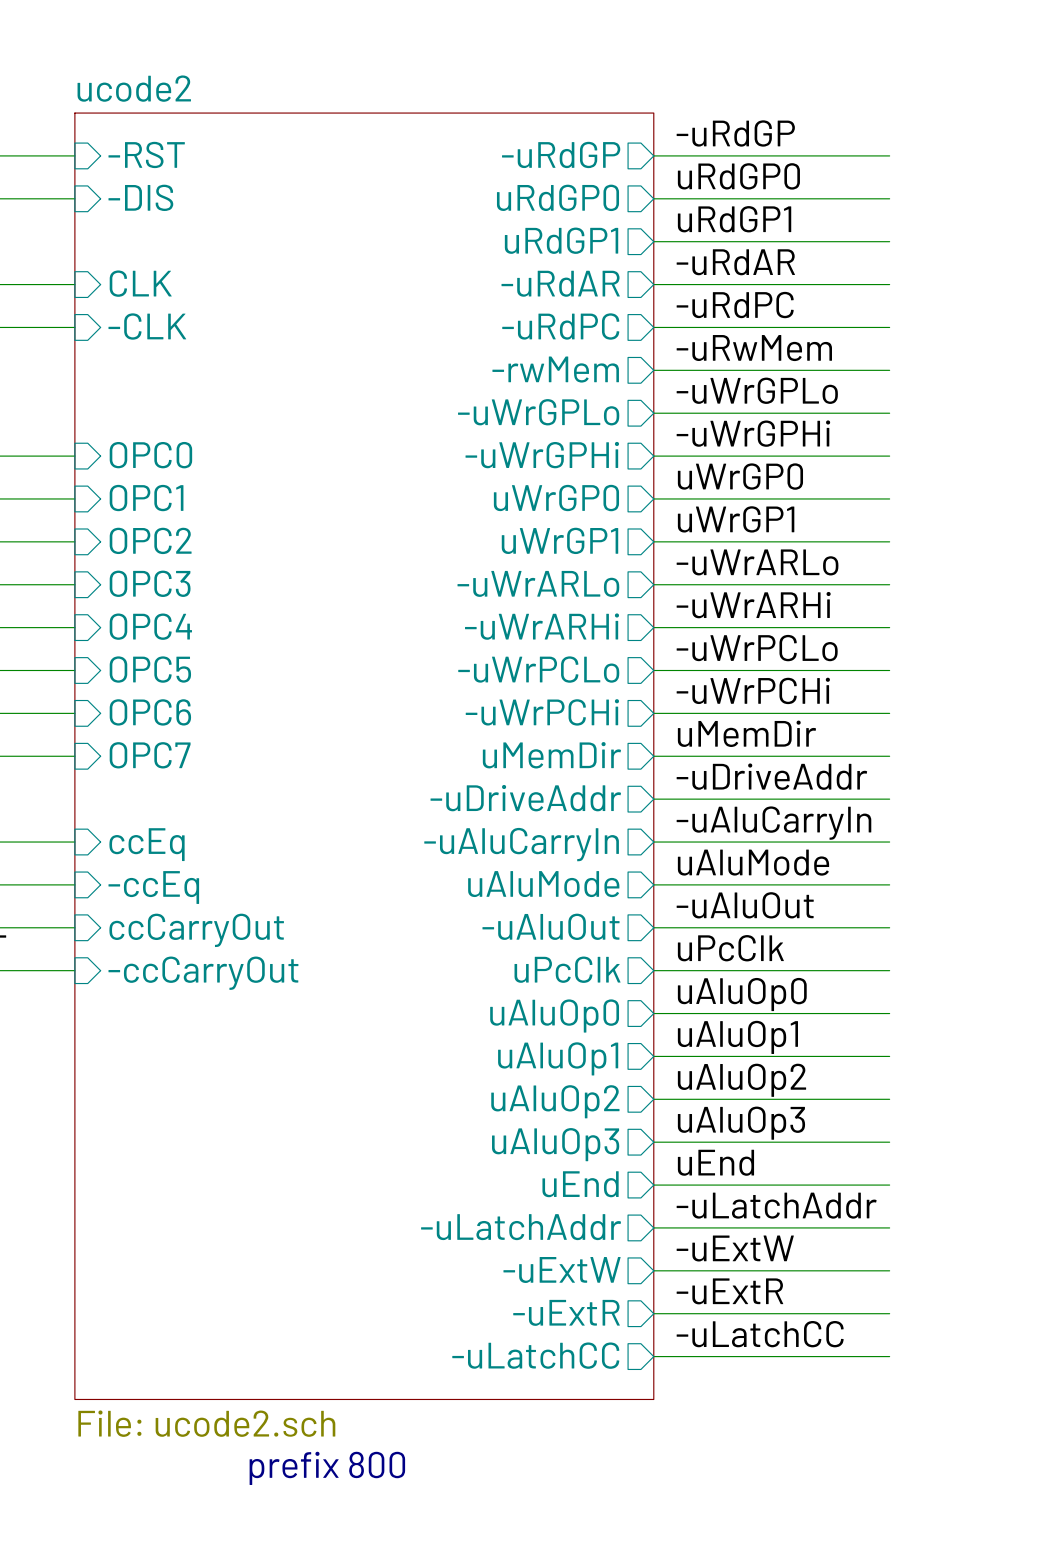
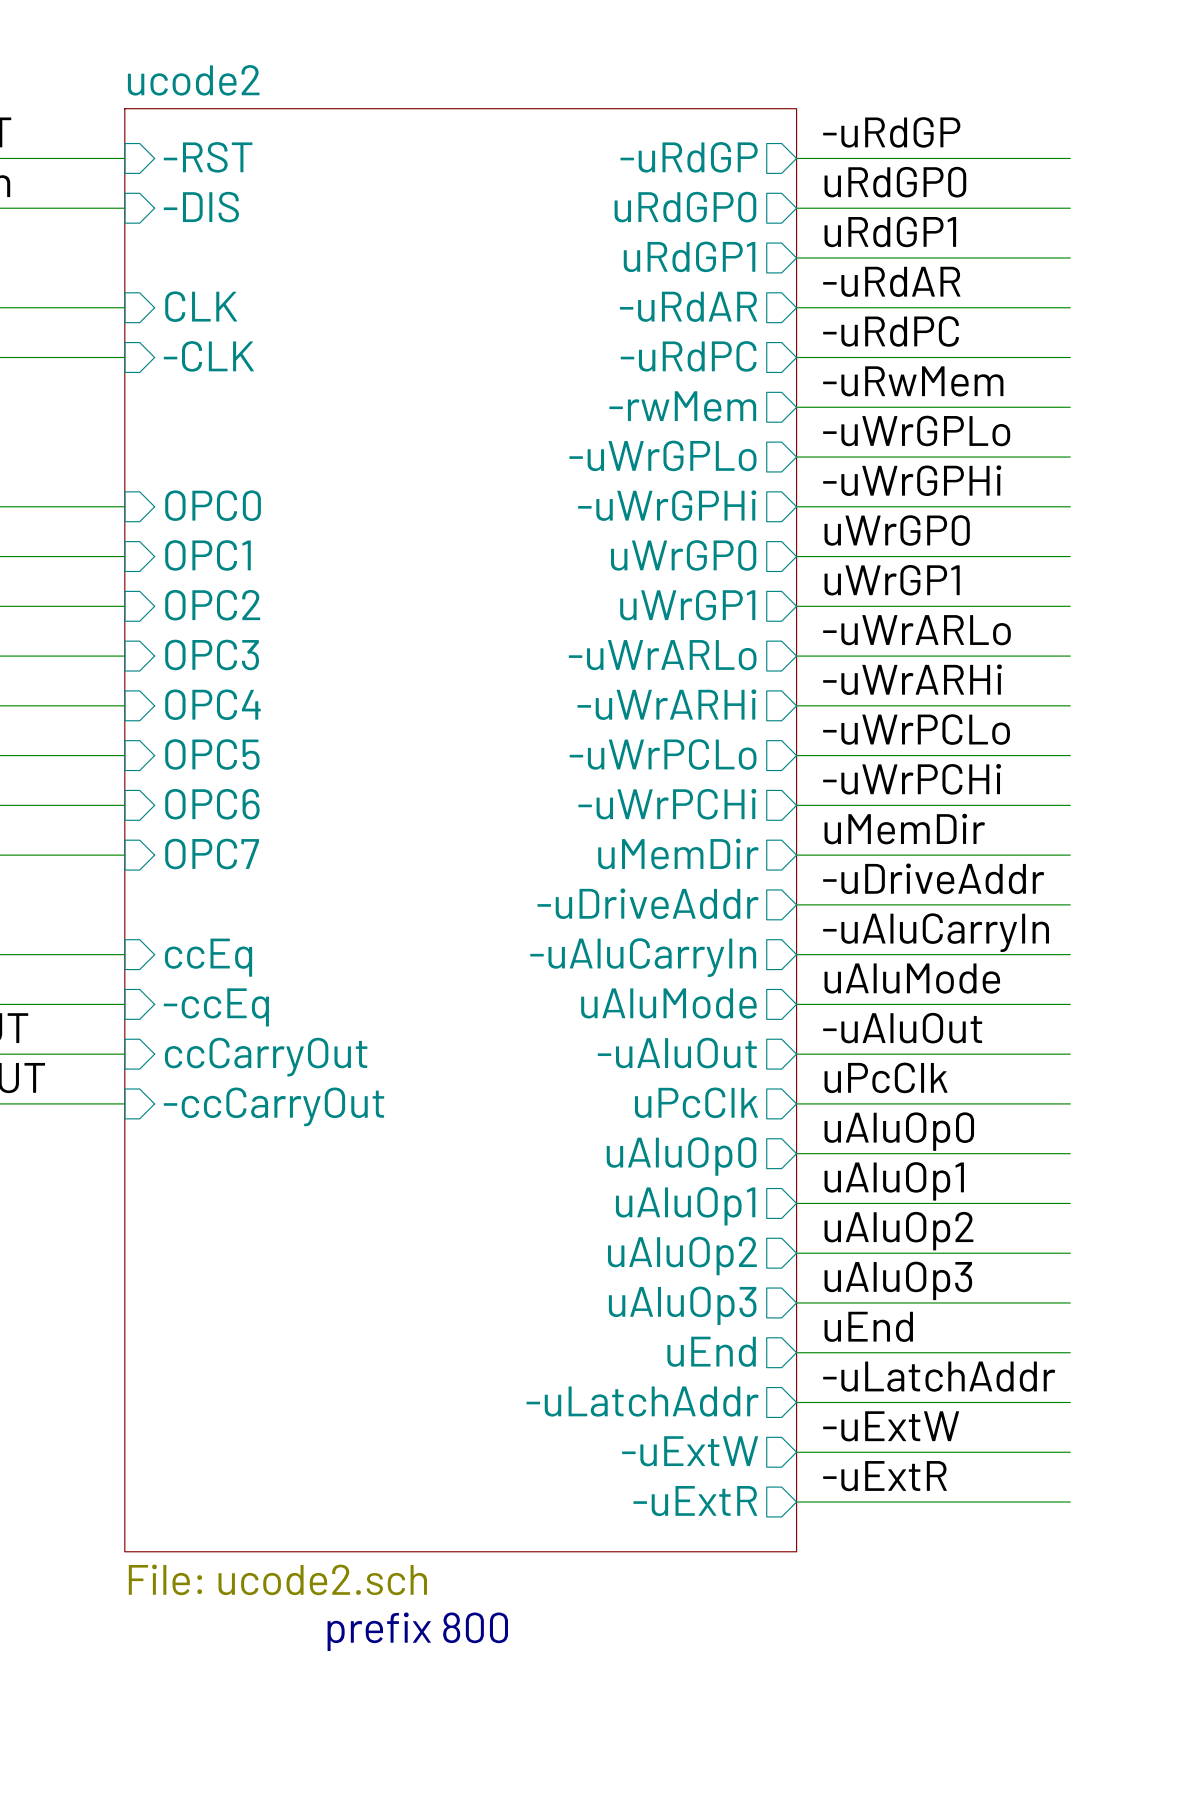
sheet ucode2 shape: [74, 113, 654, 1400] -> [124, 108, 797, 1552]
label: -uLatchCC (760, 1334) -> none
sheet pin: -uLatchCC (535, 1355) -> none
wire: (653, 1356) (889, 1356) -> none
text position: prefix 800 (327, 1468) -> prefix 800 (417, 1631)

